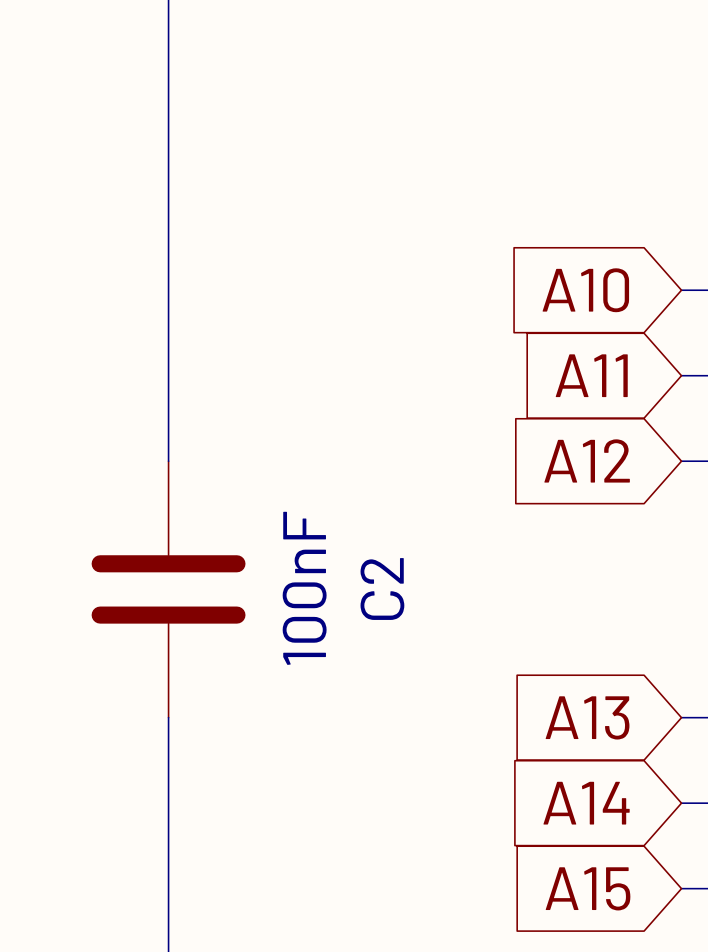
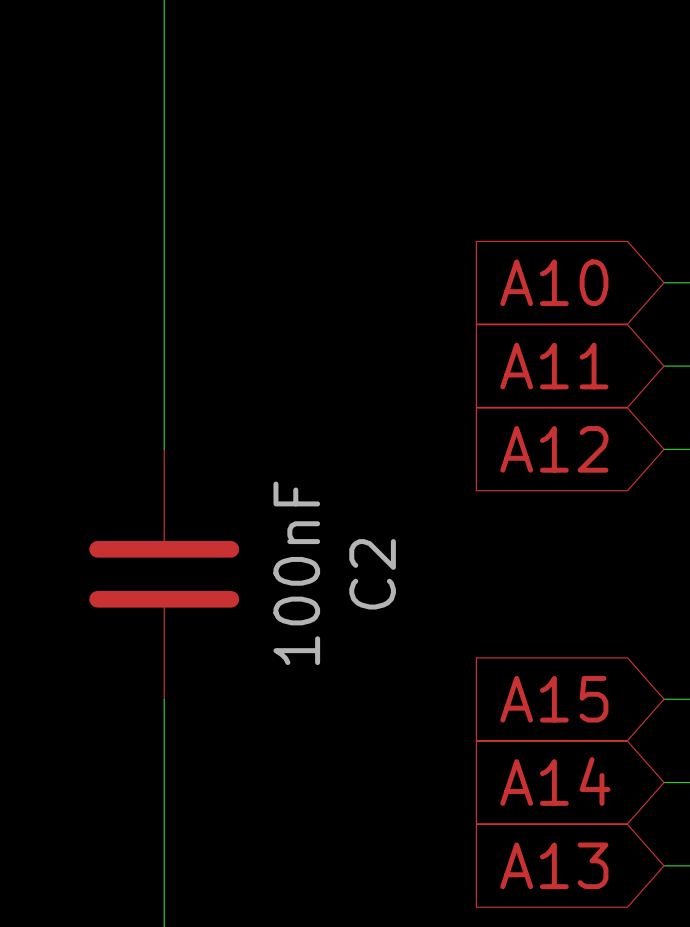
global label: A13 (587, 717) -> A15 (554, 699)
global label: A15 (587, 888) -> A13 (554, 865)

